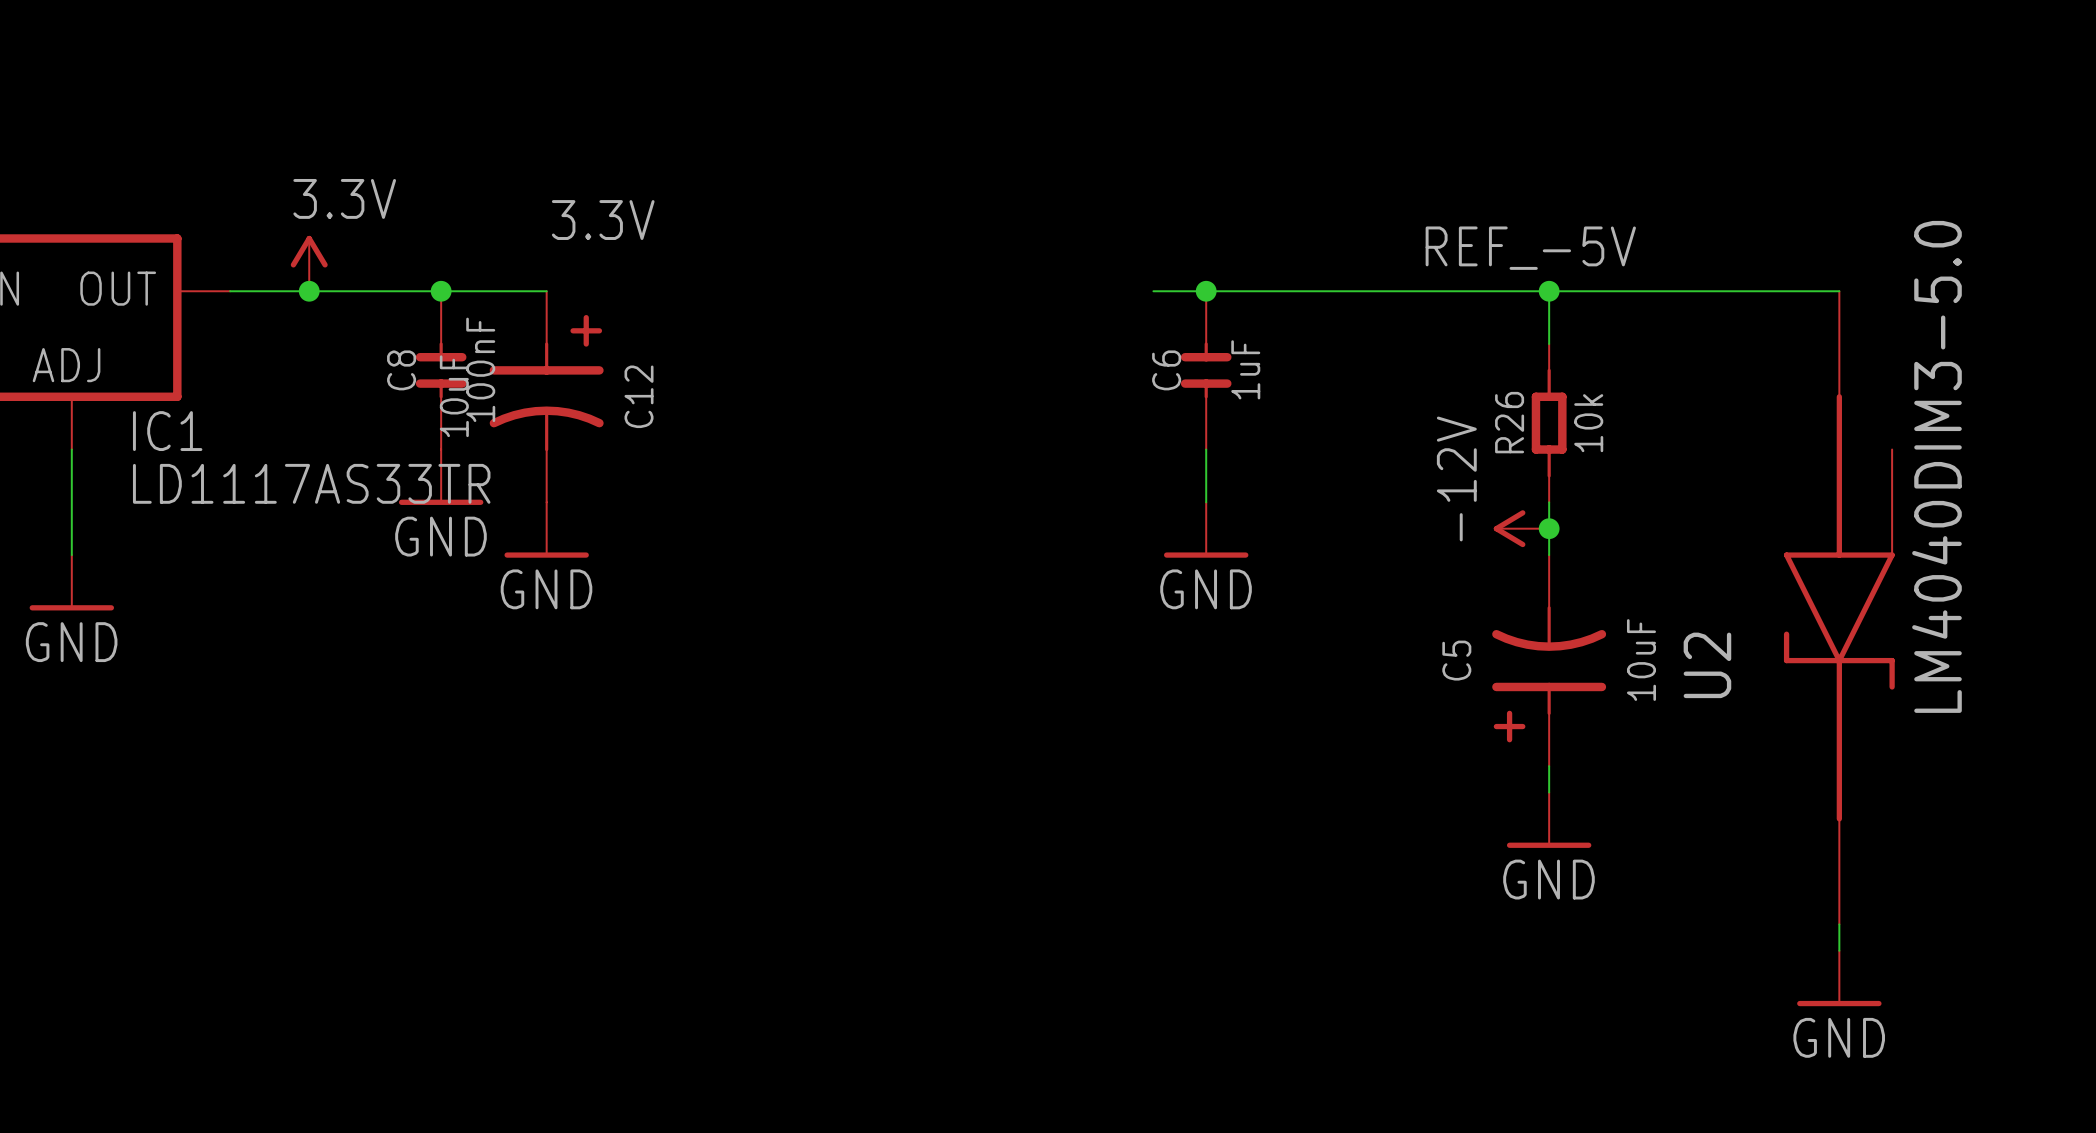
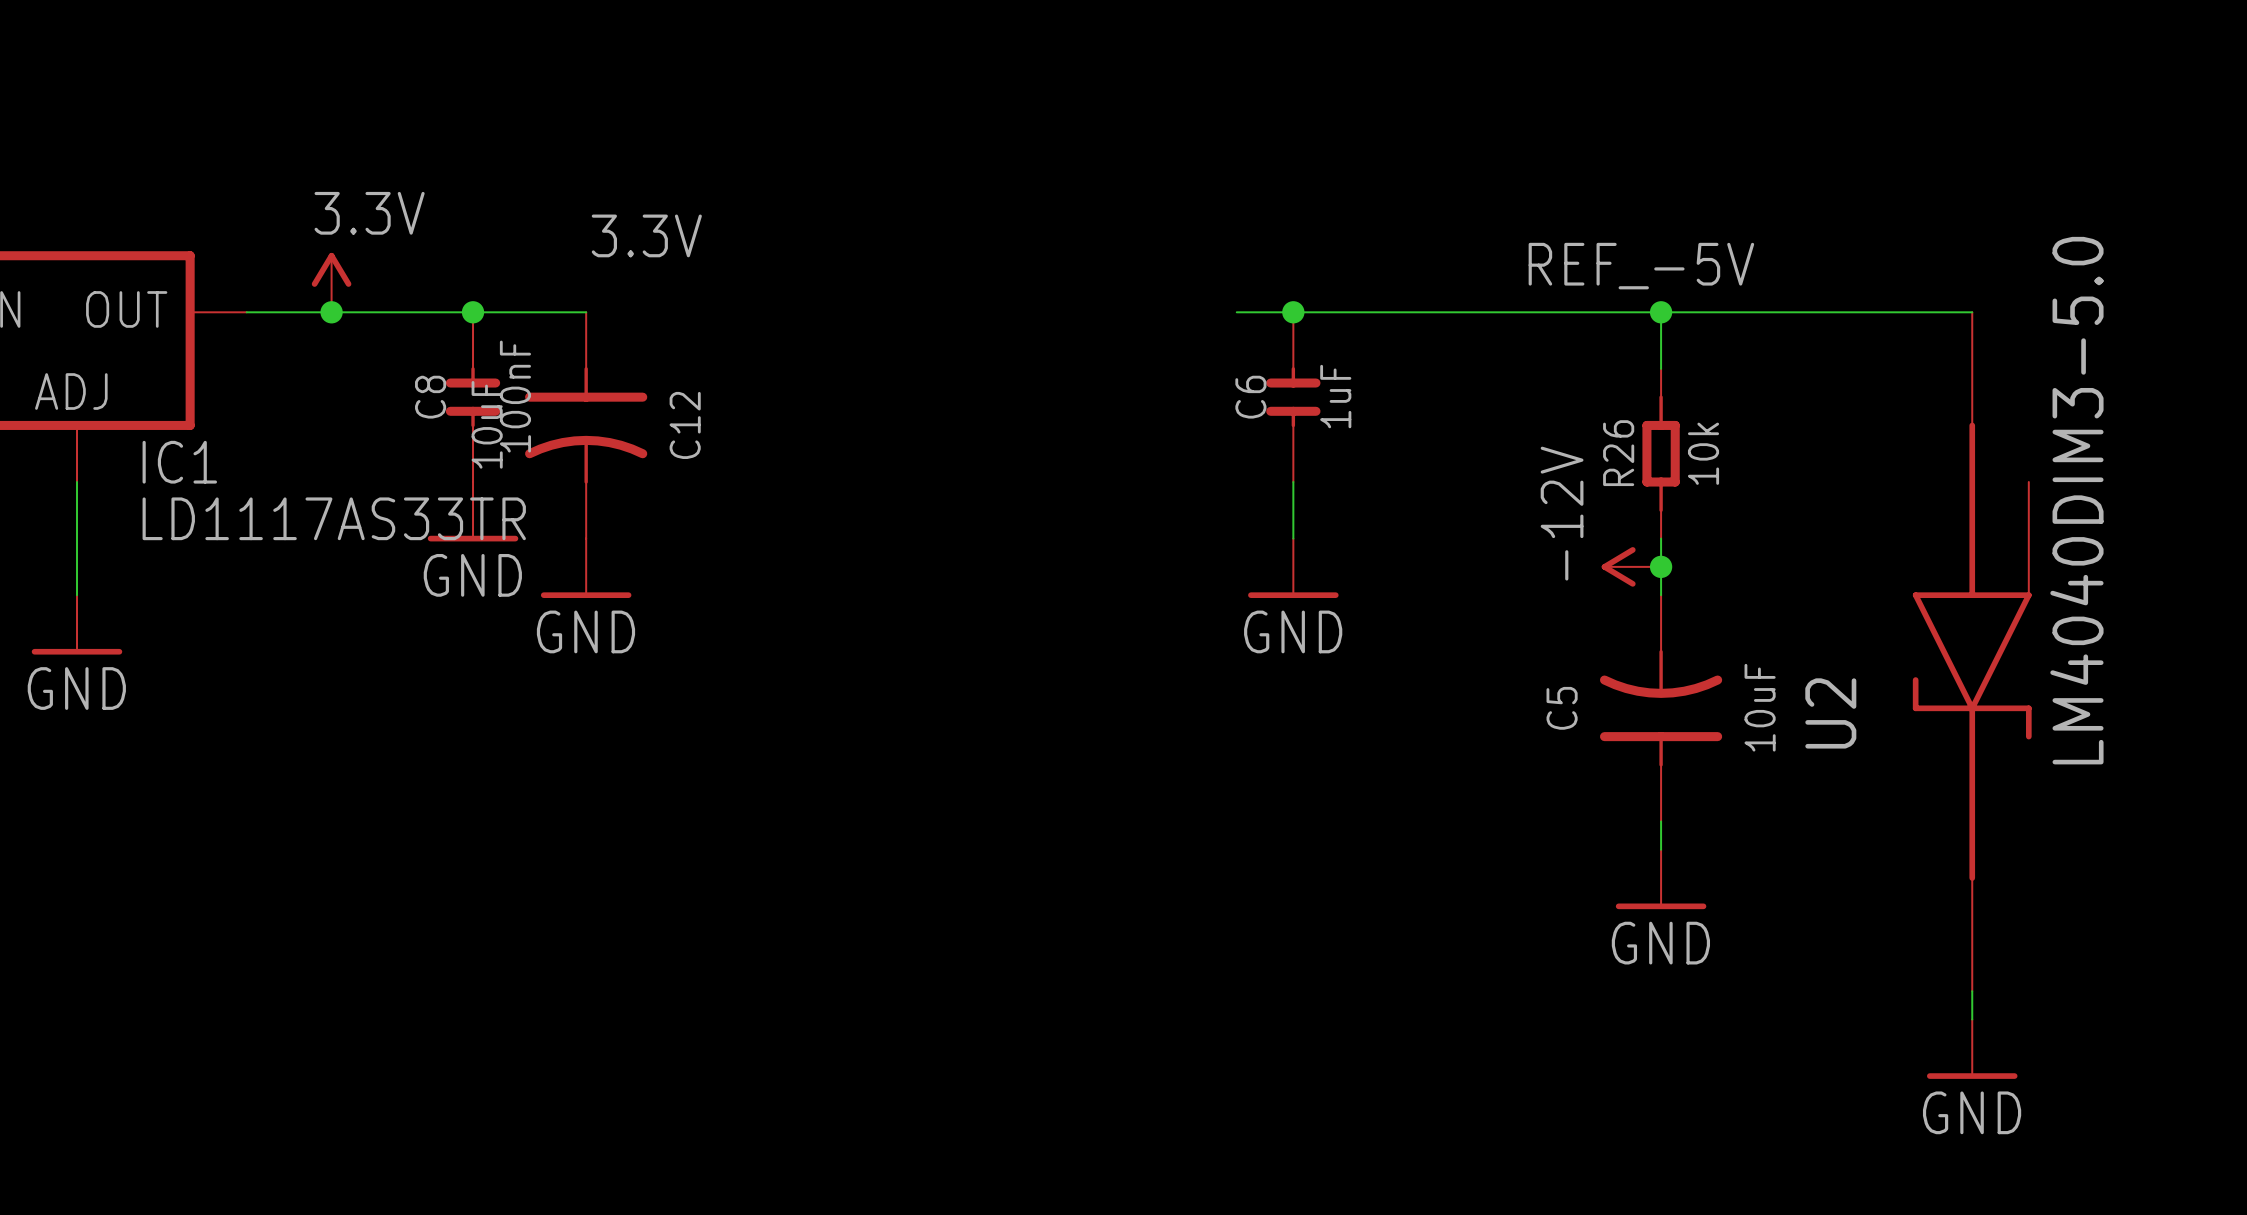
C12 symbol: [489, 291, 604, 503] -> [525, 312, 648, 539]
C5 symbol: [1492, 555, 1607, 767] -> [1599, 595, 1723, 822]

